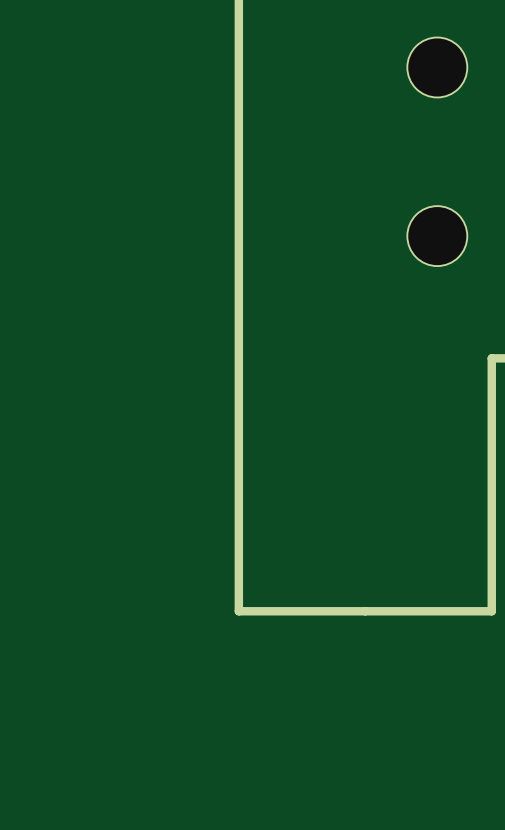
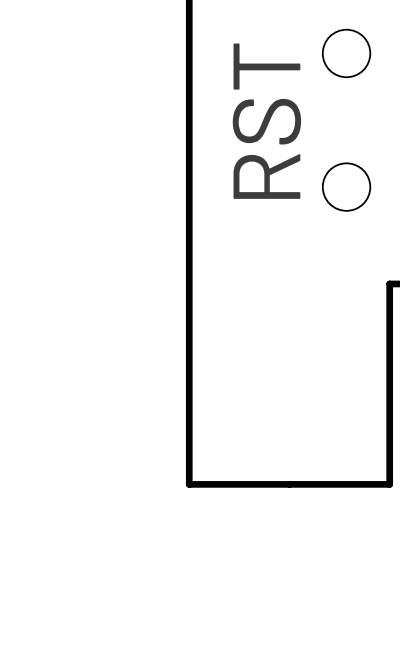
text: none -> RST (266, 121)

